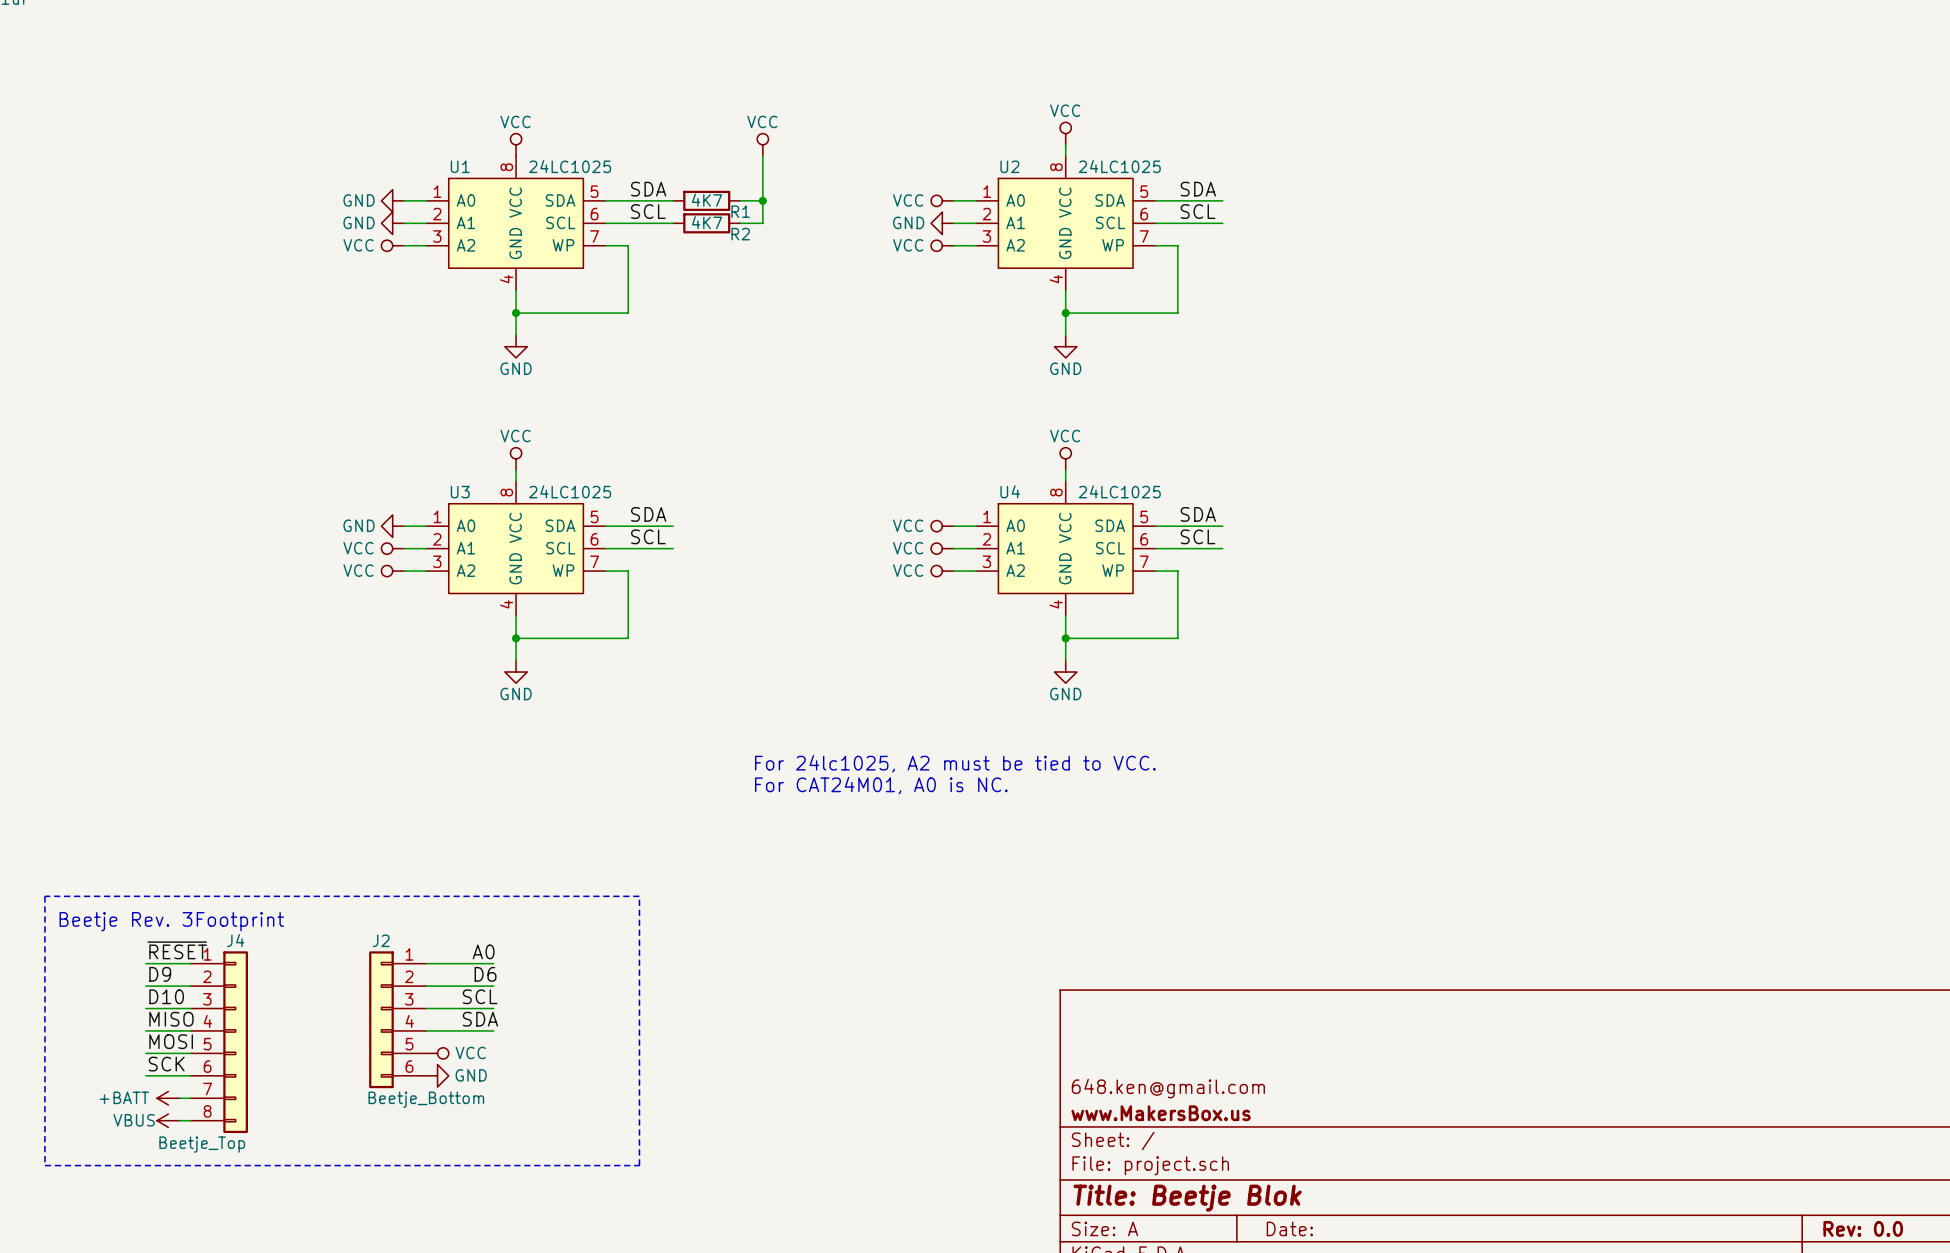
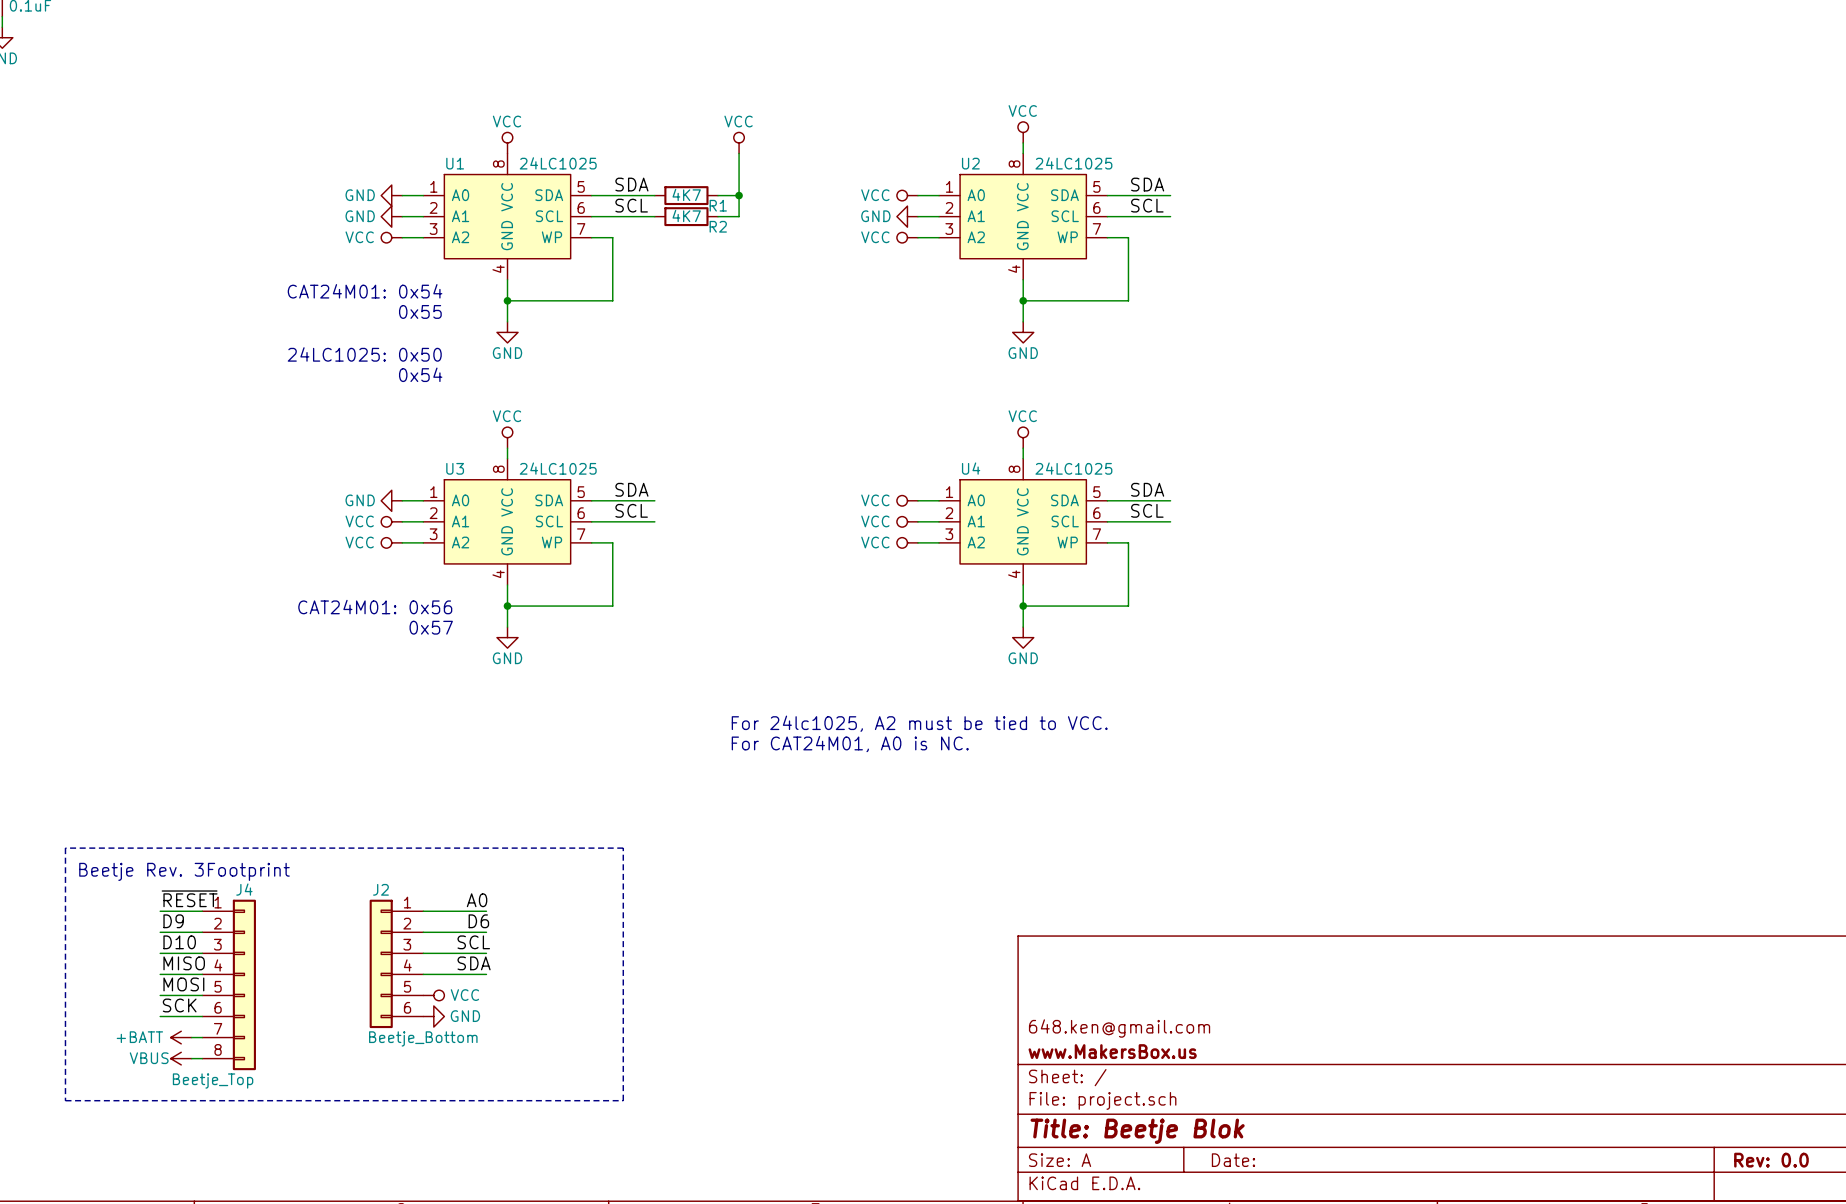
text: none -> CAT24M01: 0x54 (365, 291)
text: none -> 0x55 (420, 311)
text: none -> 24LC1025: 0x50 (364, 354)
text: none -> 0x54 (420, 374)
text: none -> CAT24M01: 0x56 (375, 607)
text: none -> 0x57 (431, 627)

